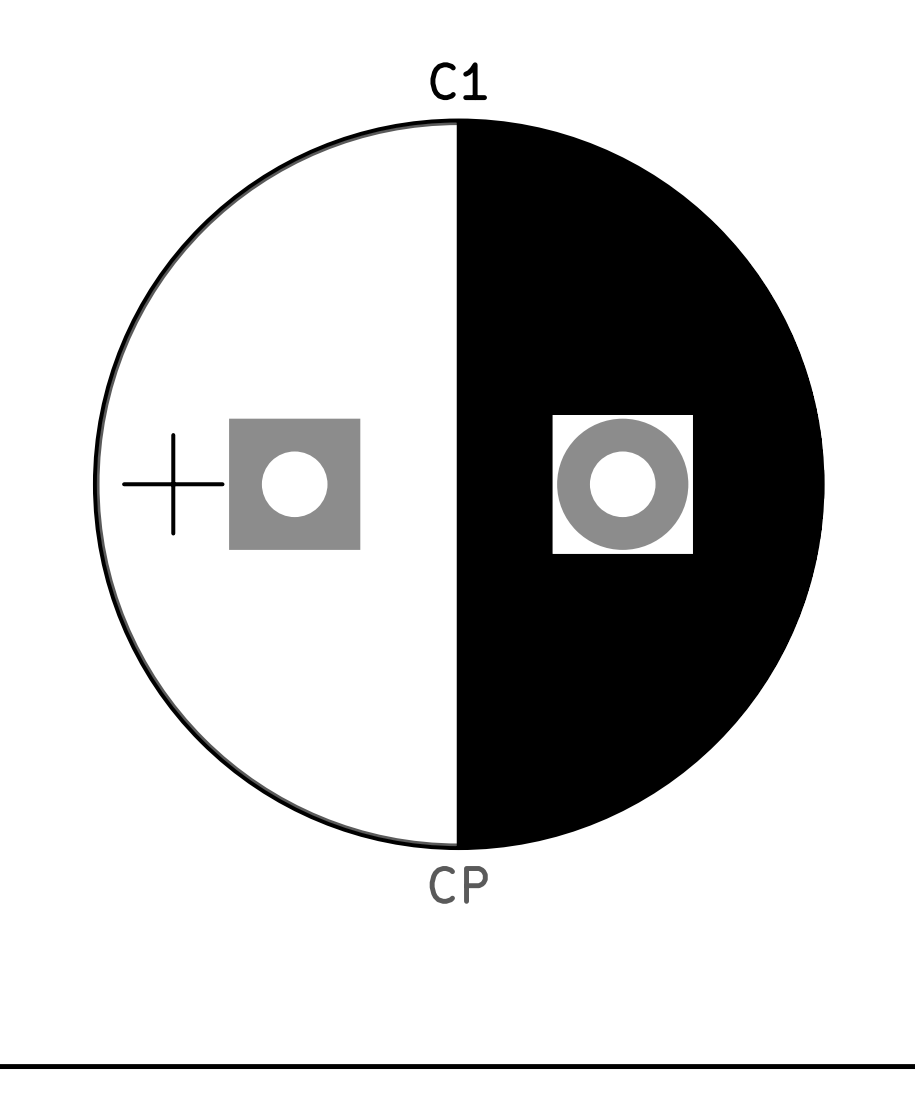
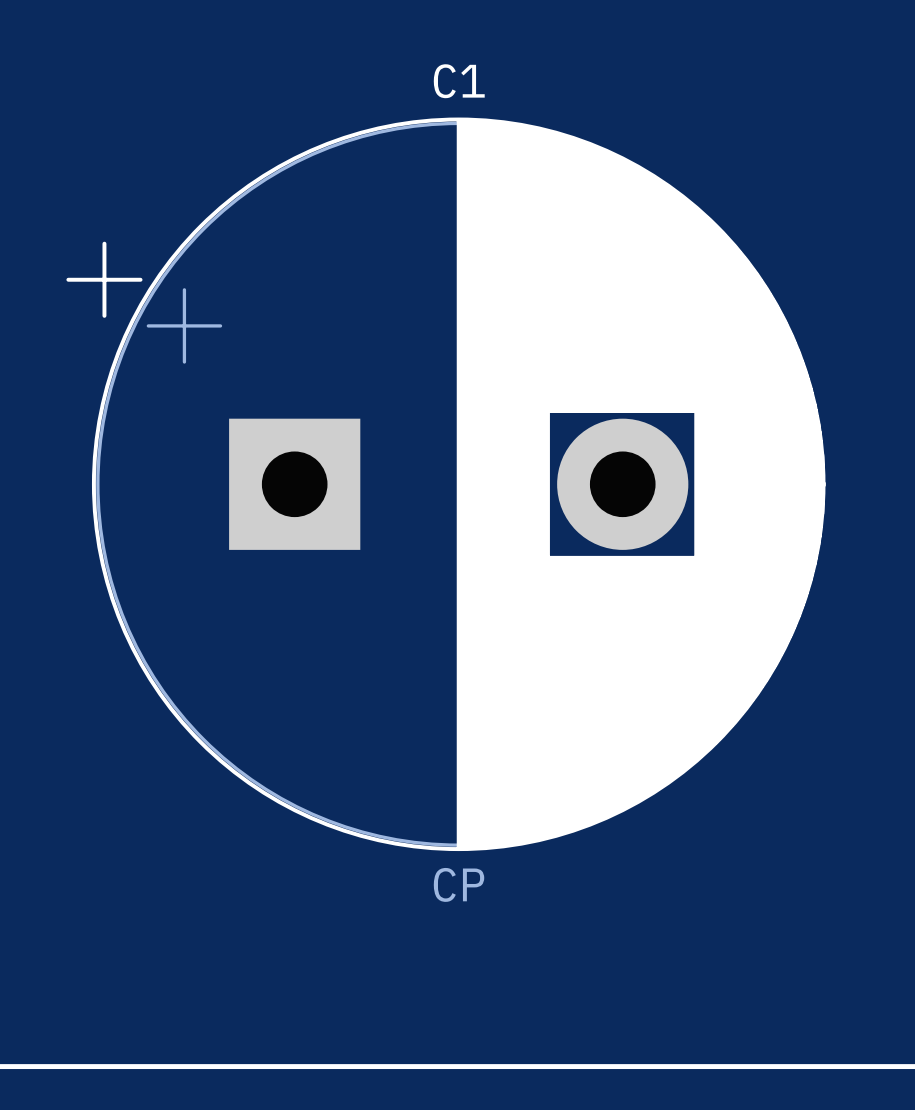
C1 footprint: [92, 118, 825, 851] -> [66, 117, 826, 852]

